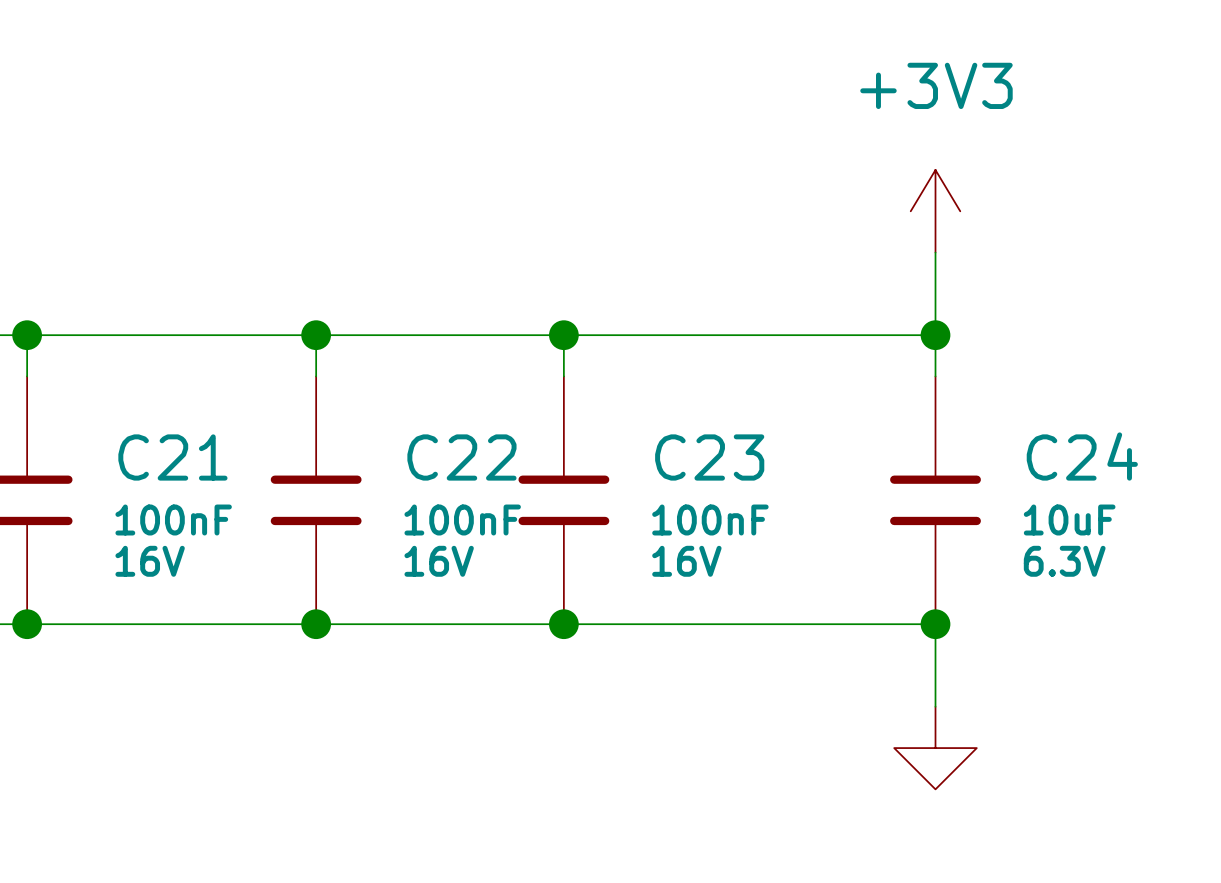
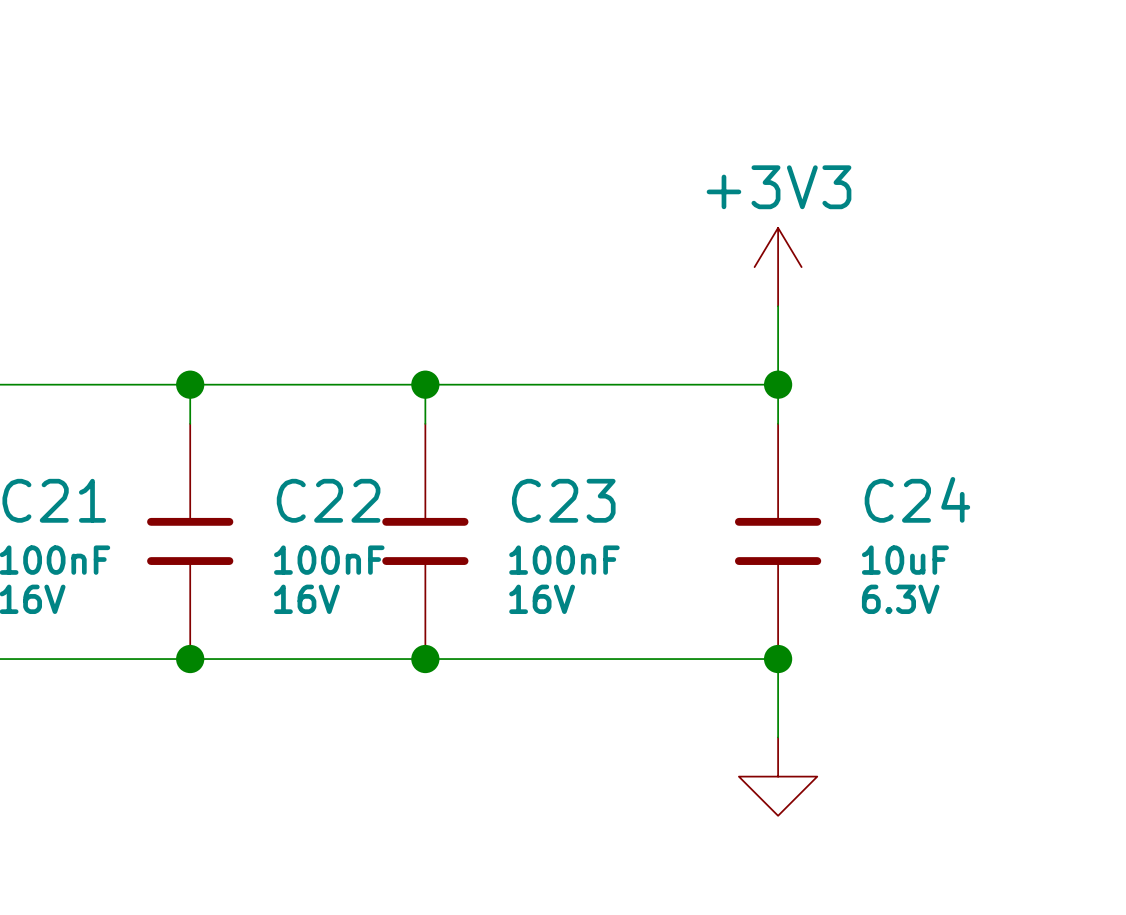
power symbol text position: +3V3 (936, 85) -> +3V3 (779, 187)

